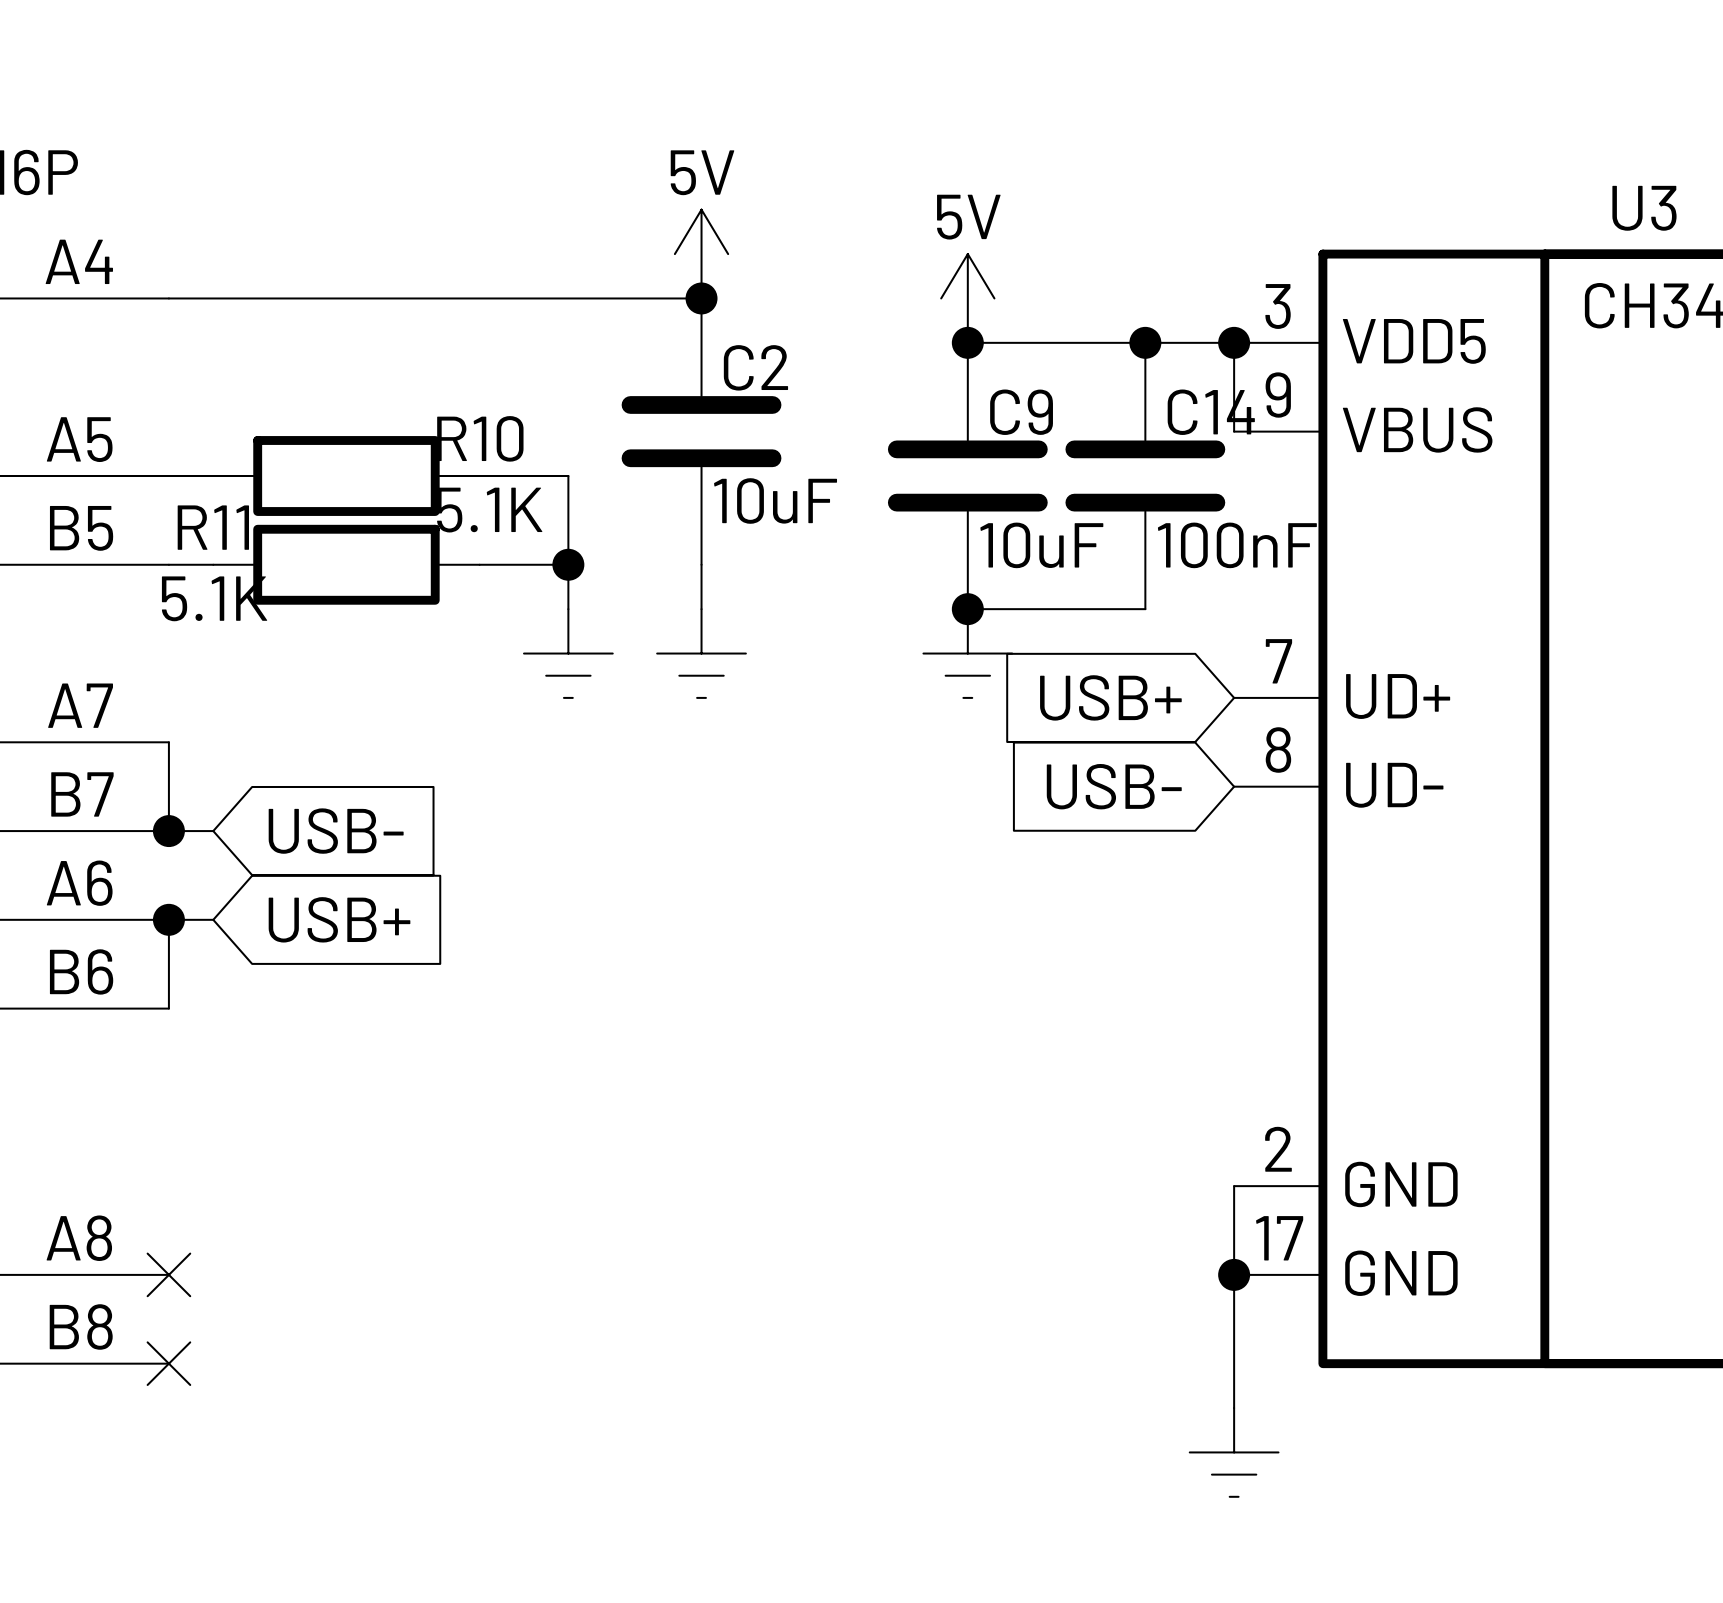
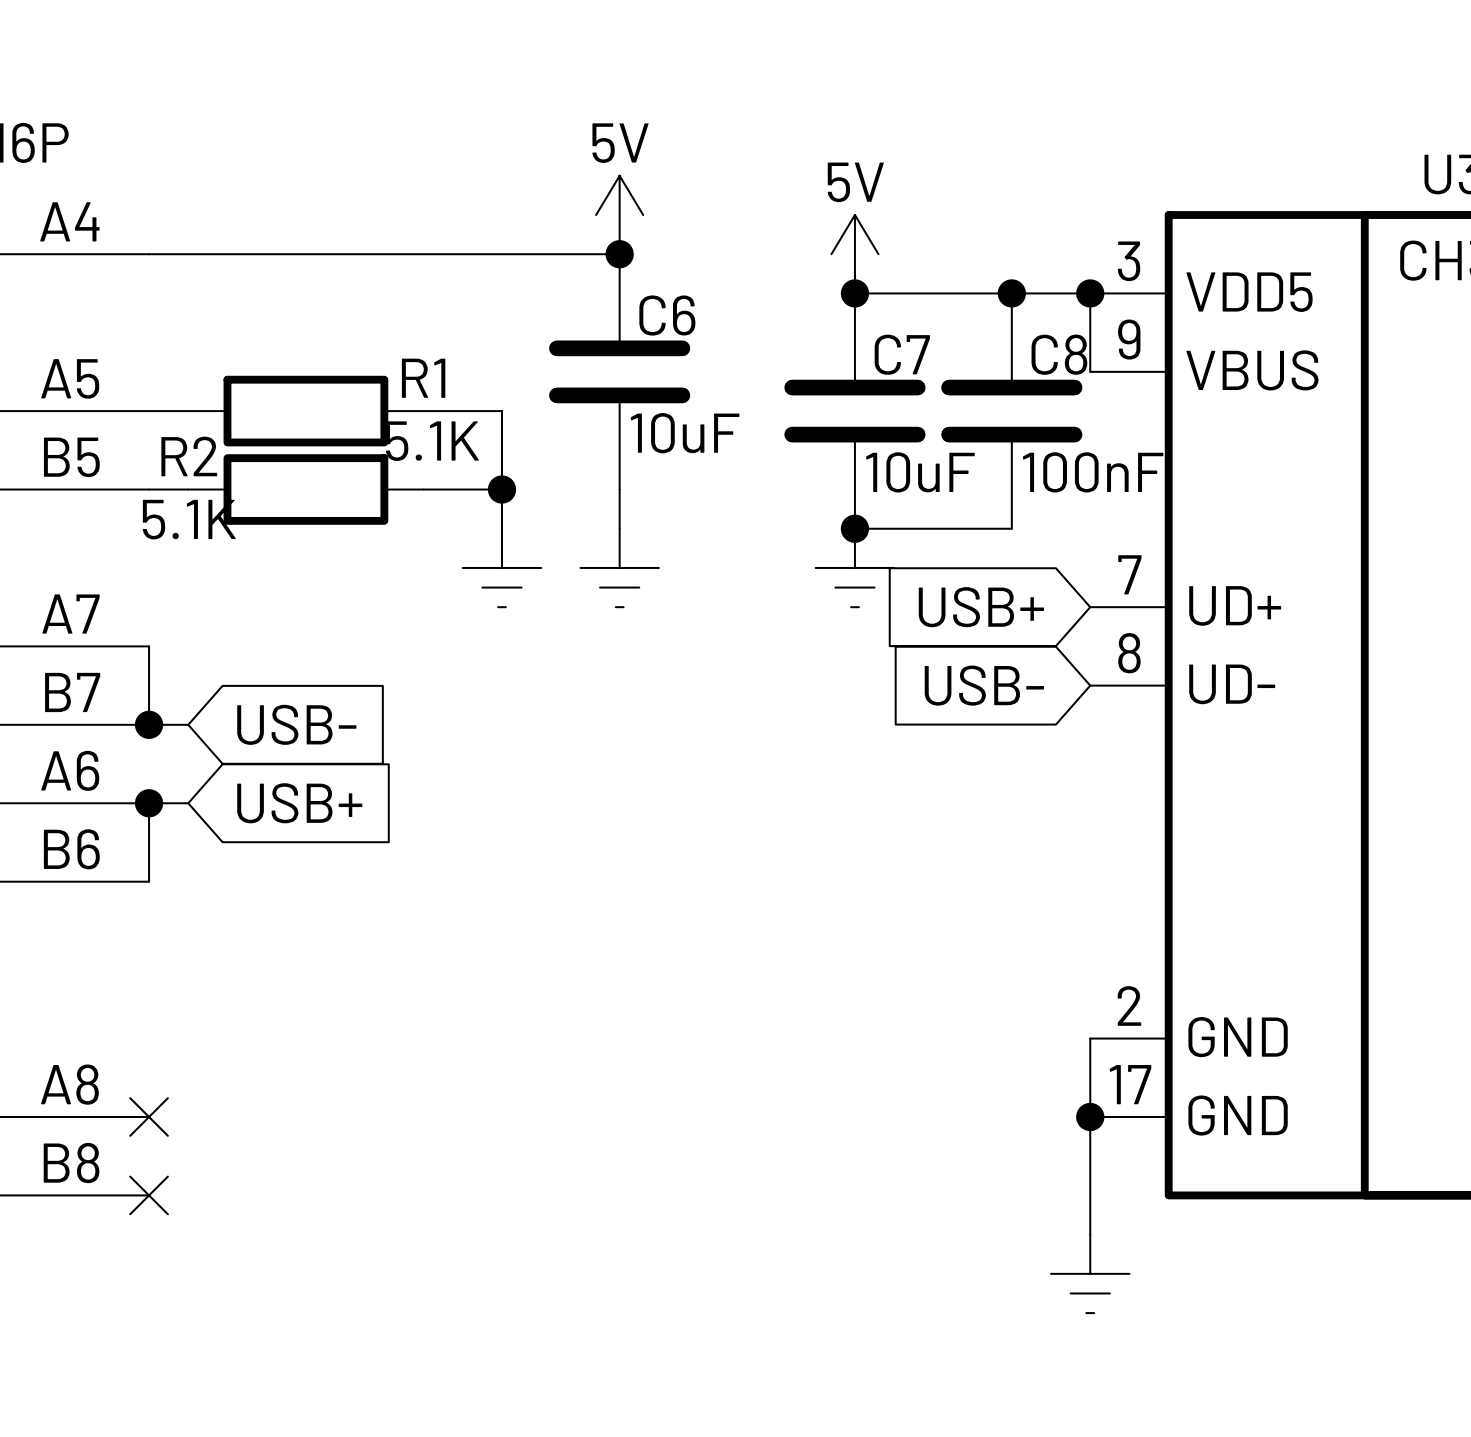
C2 name: C2 (755, 367) -> C6 (667, 315)
C9 name: C9 (1021, 412) -> C7 (902, 354)
C14 name: C14 (1211, 412) -> C8 (1059, 354)
R10 name: R10 (480, 438) -> R1 (423, 378)
R11 name: R11 (213, 527) -> R2 (189, 456)

